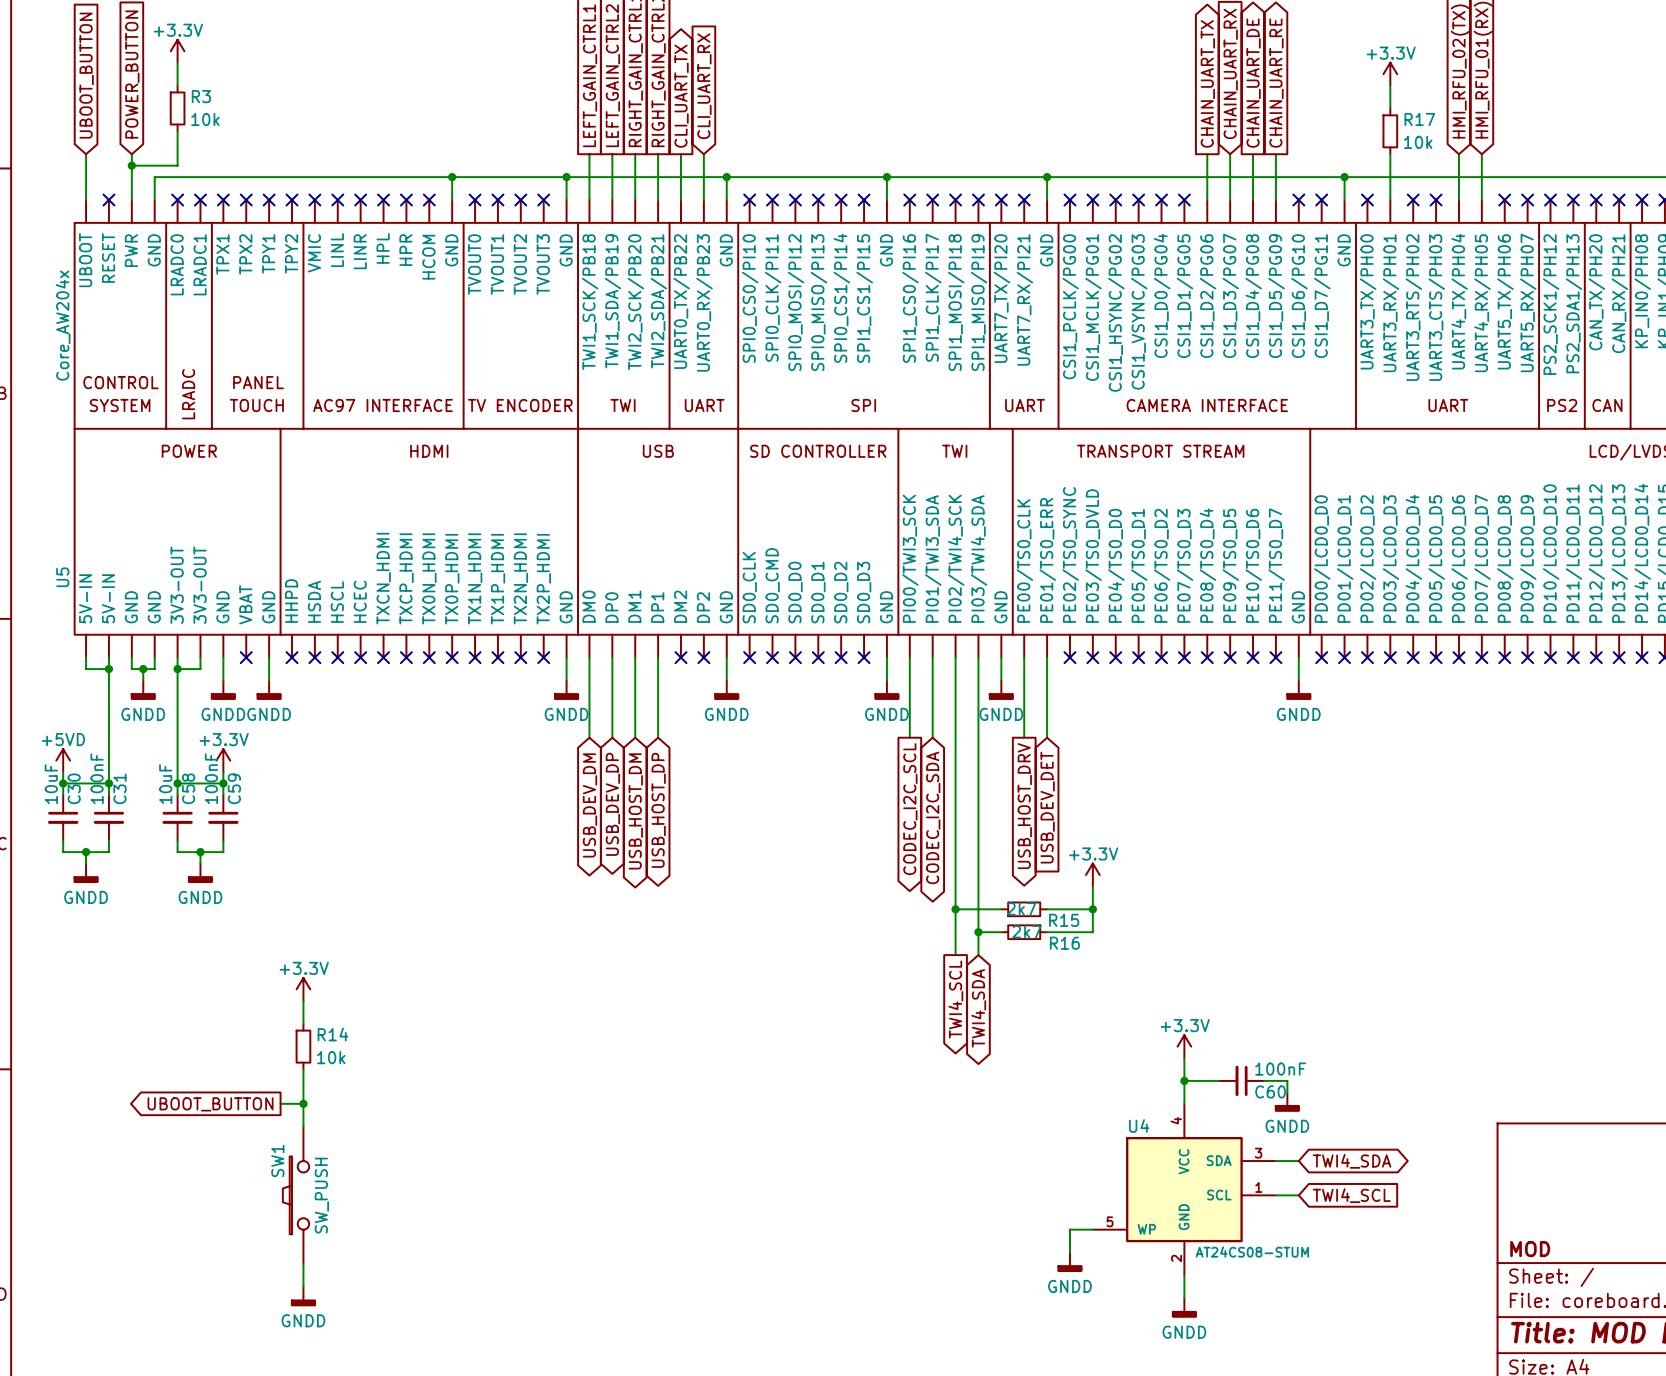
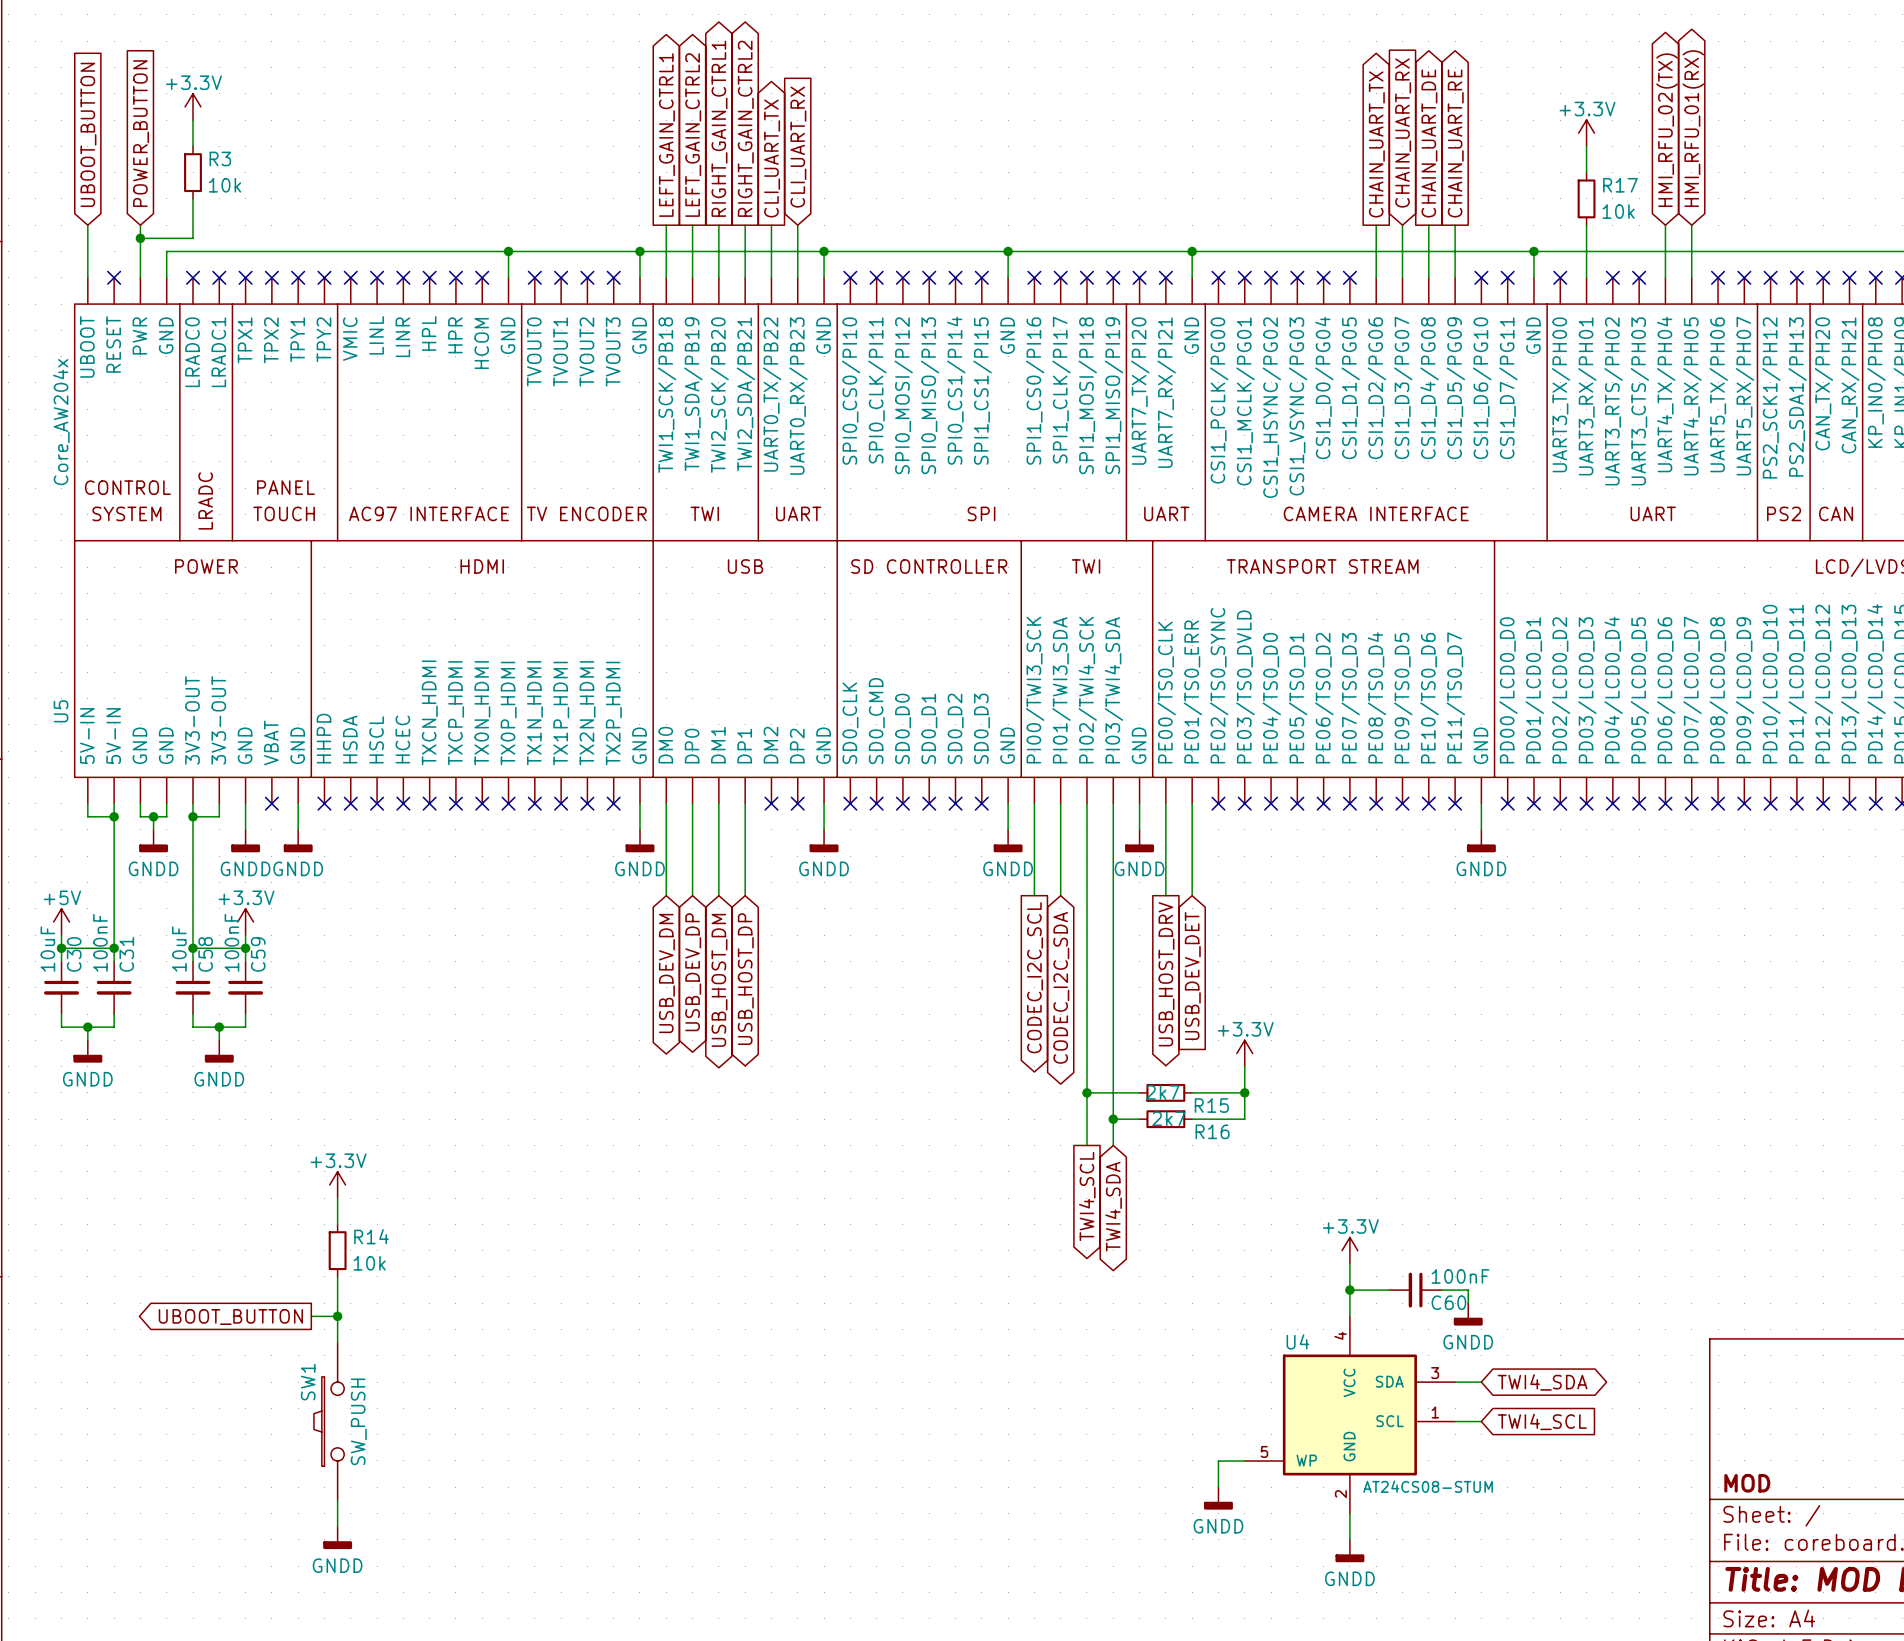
power symbol: +5VD (63, 760) -> +5V (61, 921)

